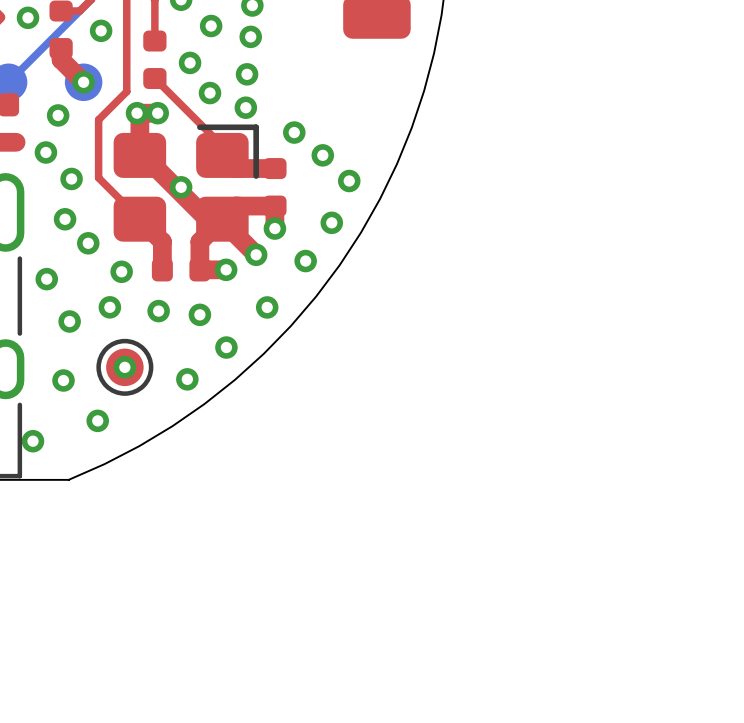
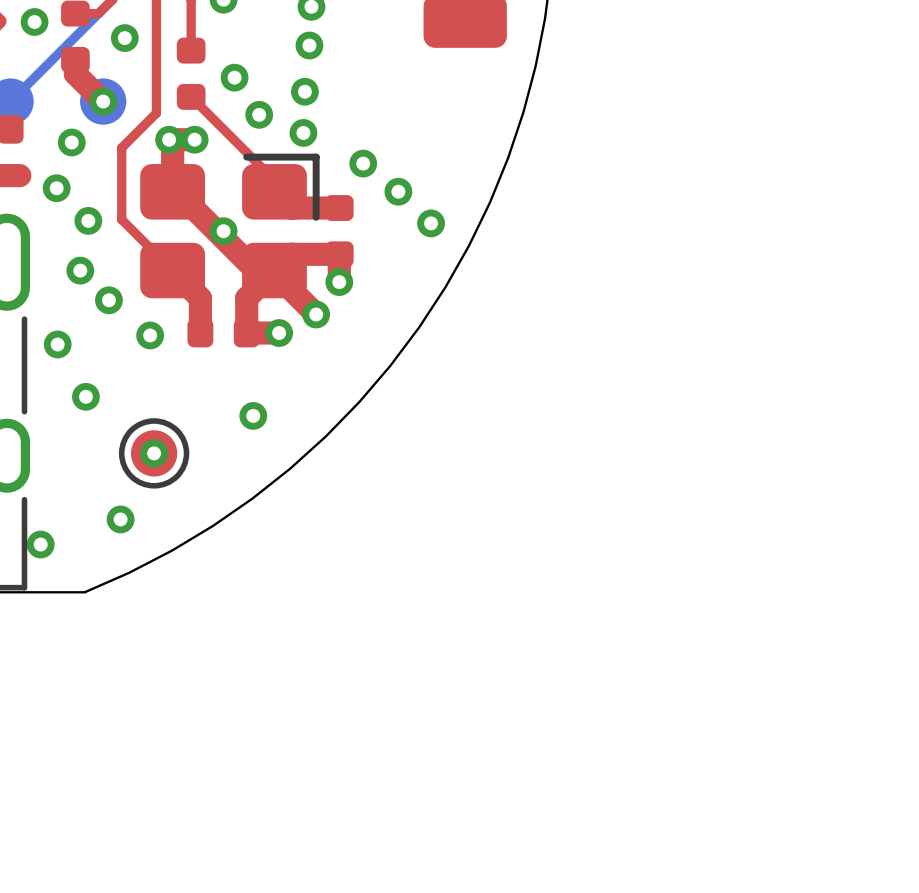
via: (211, 26) -> none
via: (331, 222) -> none
via: (305, 261) -> none
via: (109, 307) -> none
via: (267, 307) -> none
via: (158, 311) -> none
via: (199, 314) -> none
via: none -> (253, 415)
via: (226, 347) -> none
via: (187, 379) -> none
via: (63, 380) -> none

